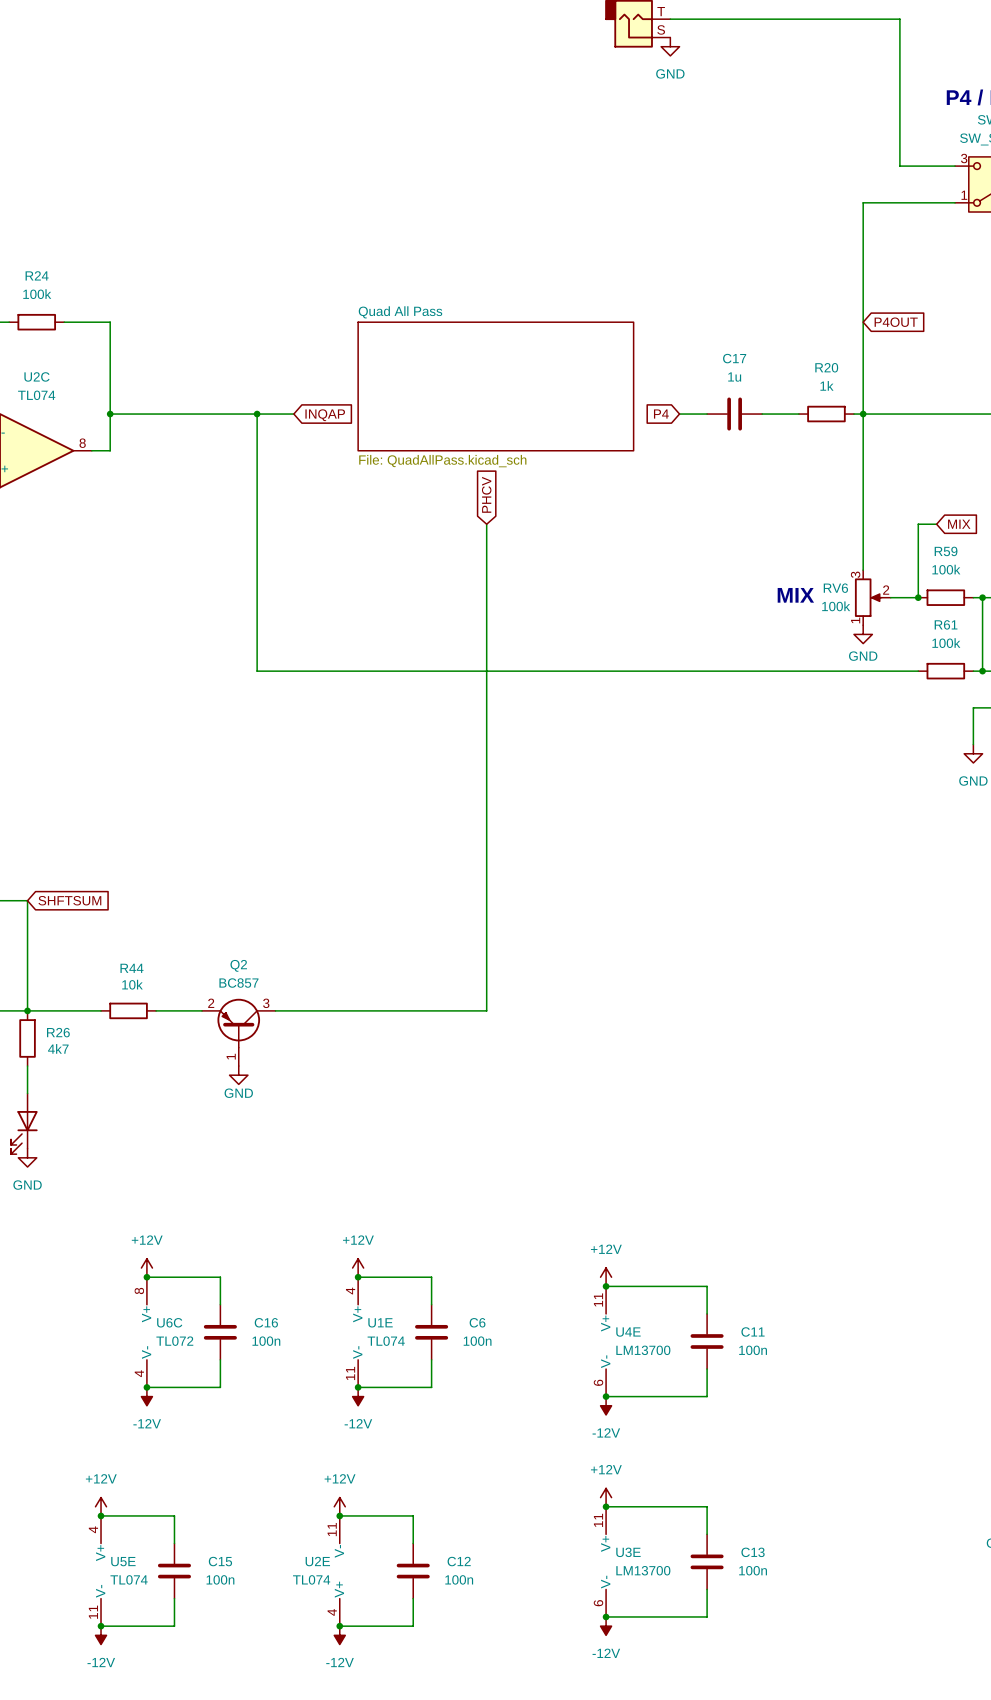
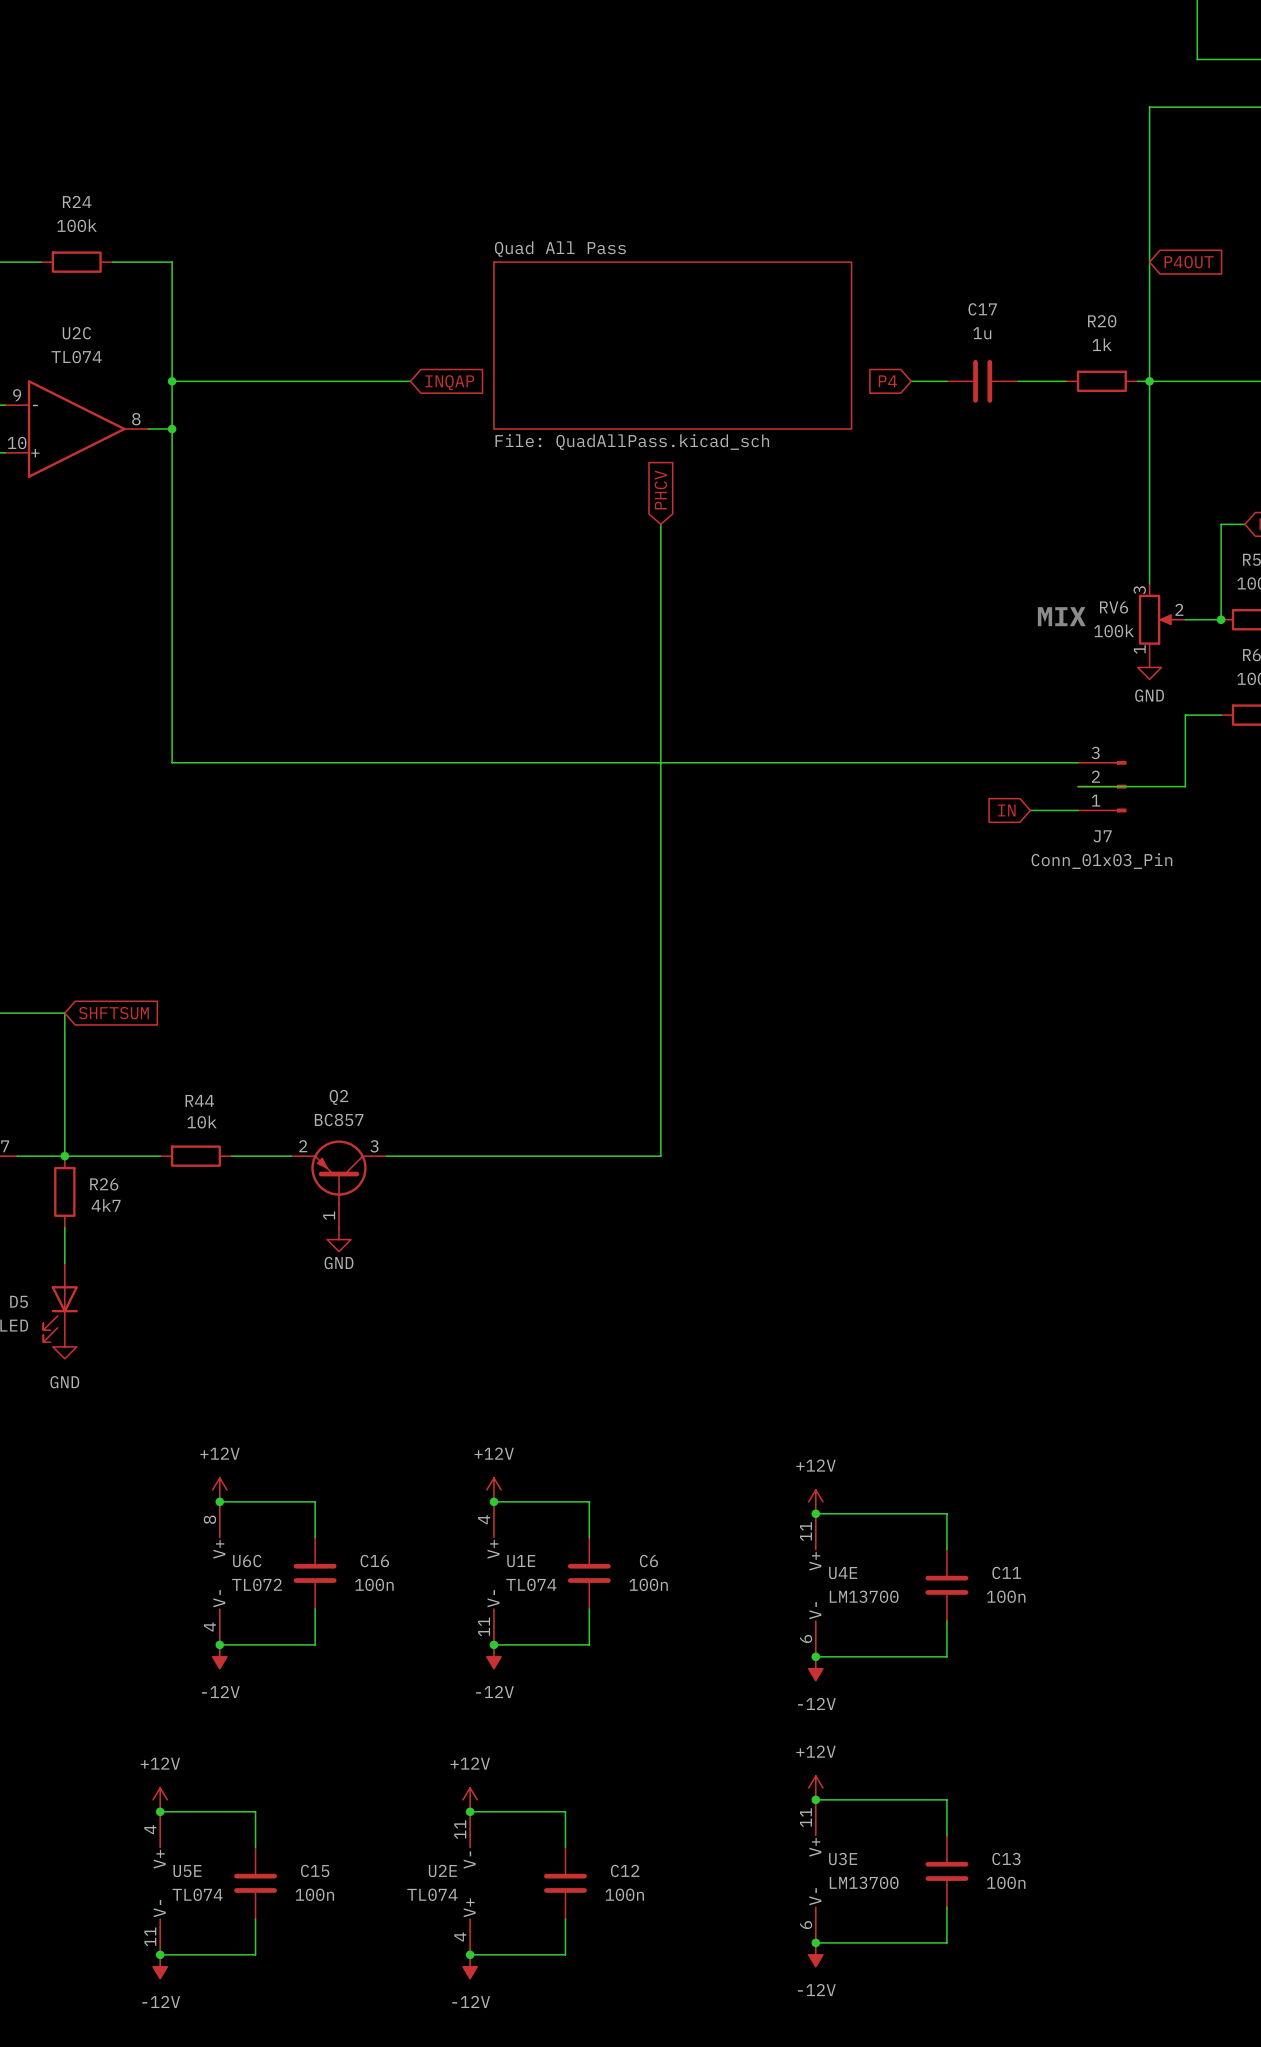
wire: (257, 414) (257, 671) (890, 671) -> (1078, 786) (1185, 786) (1185, 715)
junction: (257, 414) -> none
wire: none -> (172, 429) (172, 762) (1078, 762)
junction: none -> (172, 429)
J7: none -> Conn_01x03_Pin (1102, 786)
global label: none -> IN (1006, 810)
wire: none -> (1030, 810) (1078, 810)

